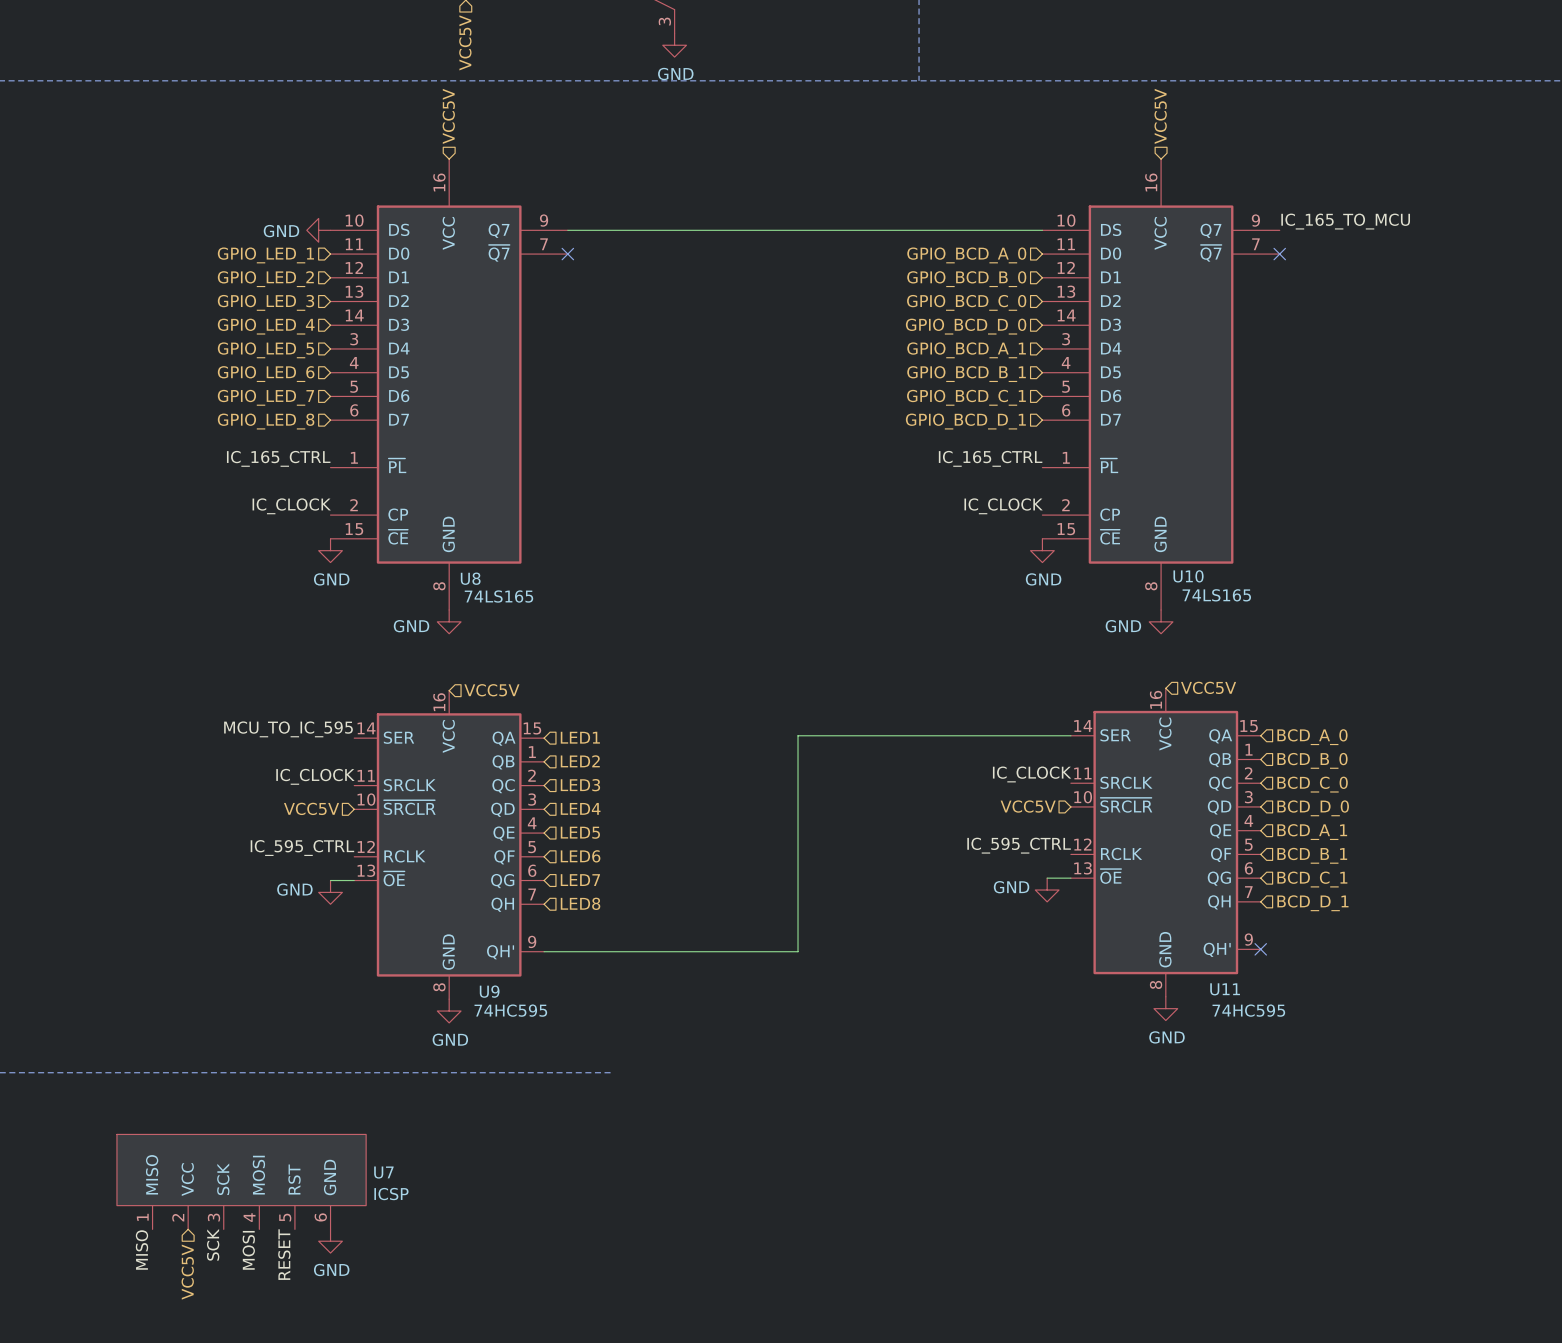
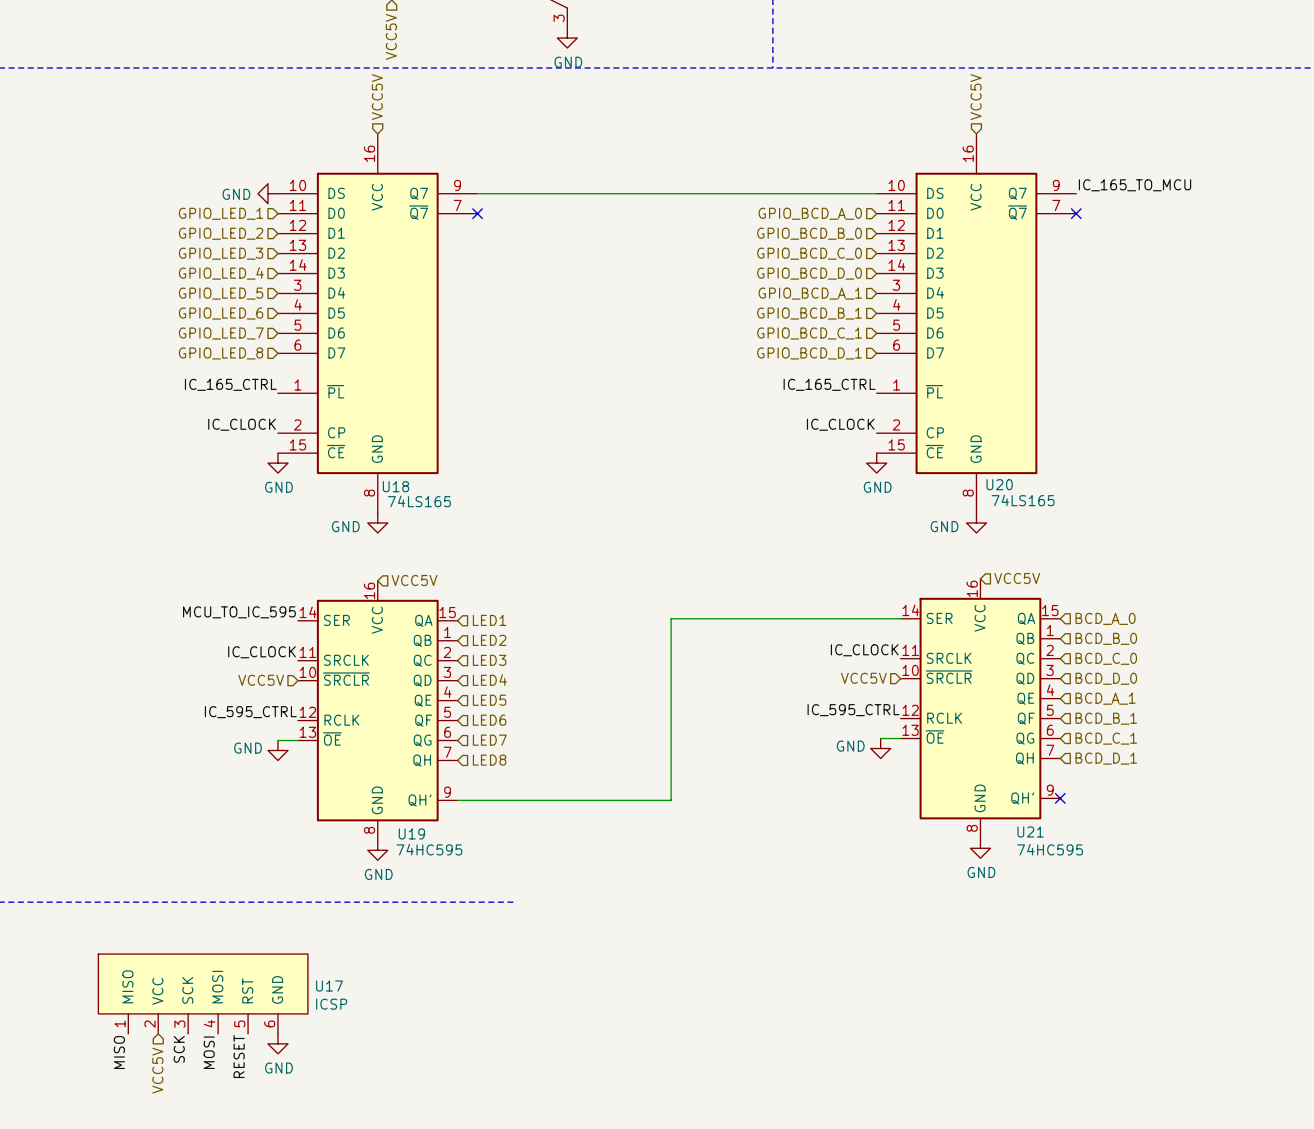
U10 name: U10 (1188, 576) -> U20 (999, 484)
U8 name: U8 (470, 578) -> U18 (395, 486)
U11 name: U11 (1225, 989) -> U21 (1030, 831)
U9 name: U9 (489, 991) -> U19 (411, 833)
U7 name: U7 (383, 1172) -> U17 (329, 986)

